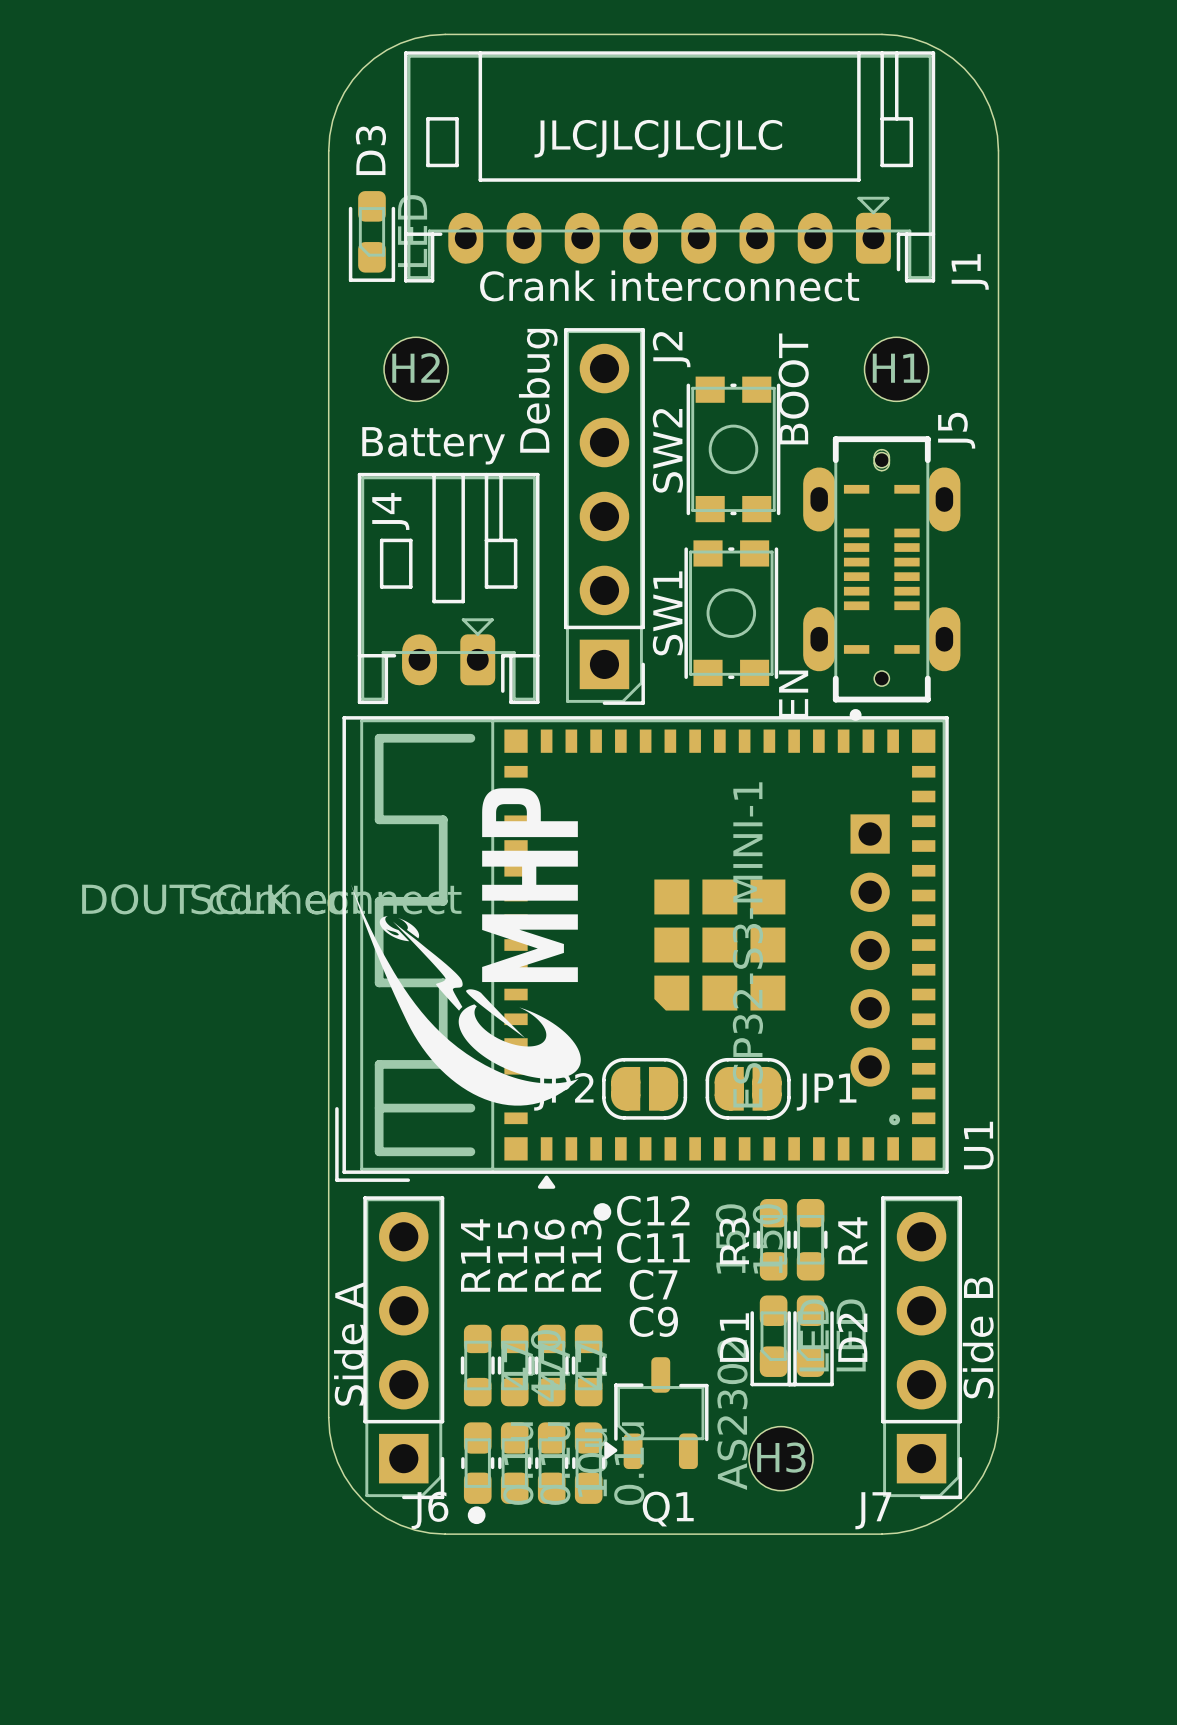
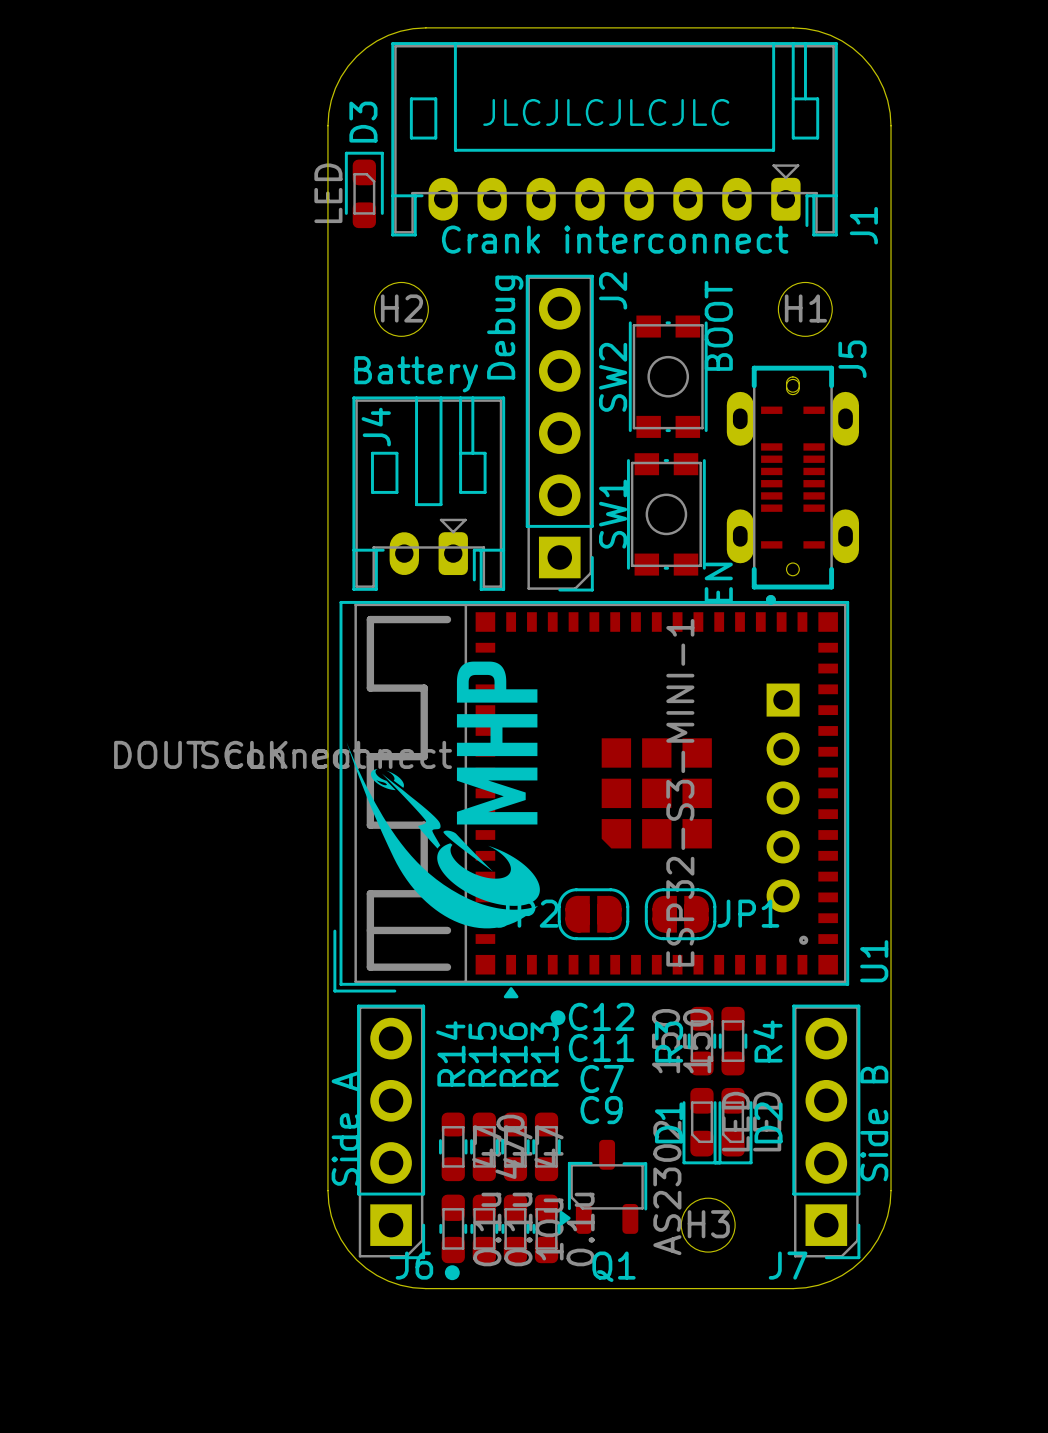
D3 rotation: 0° (371, 236) -> 180° (364, 189)

